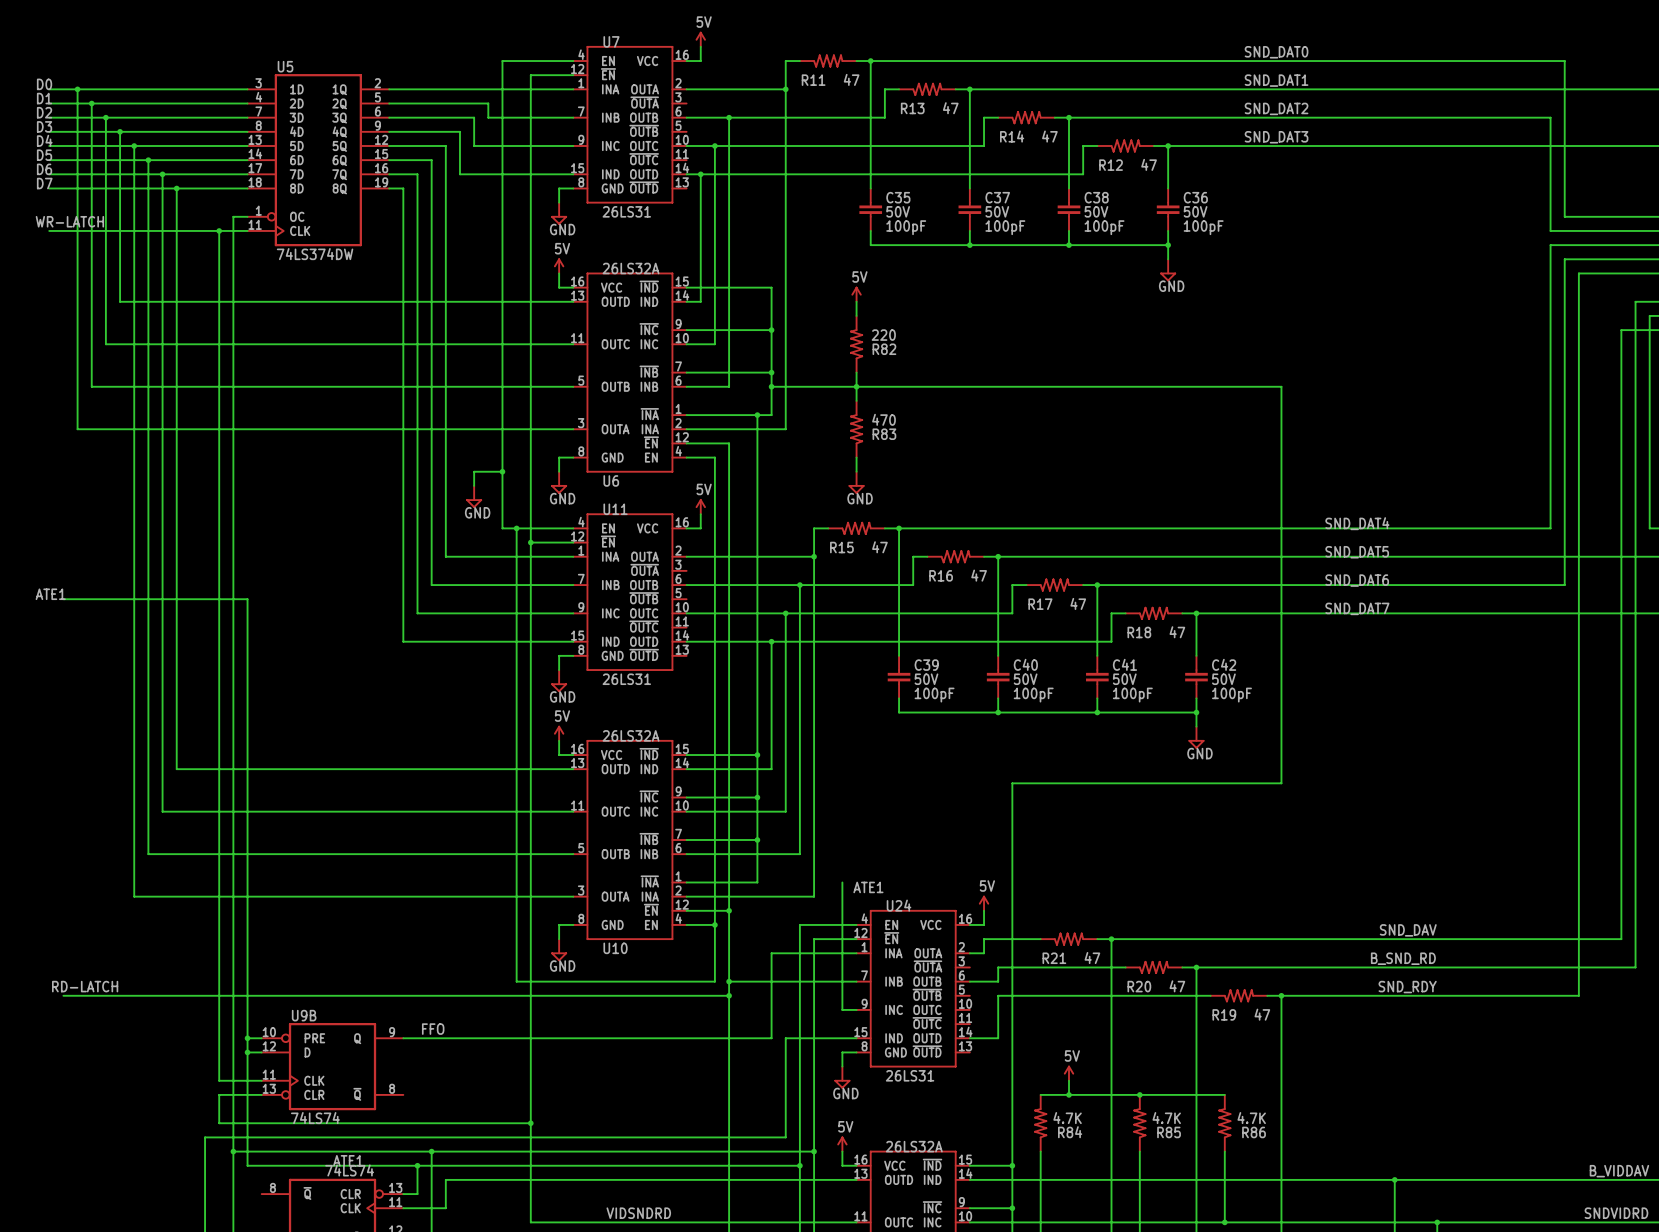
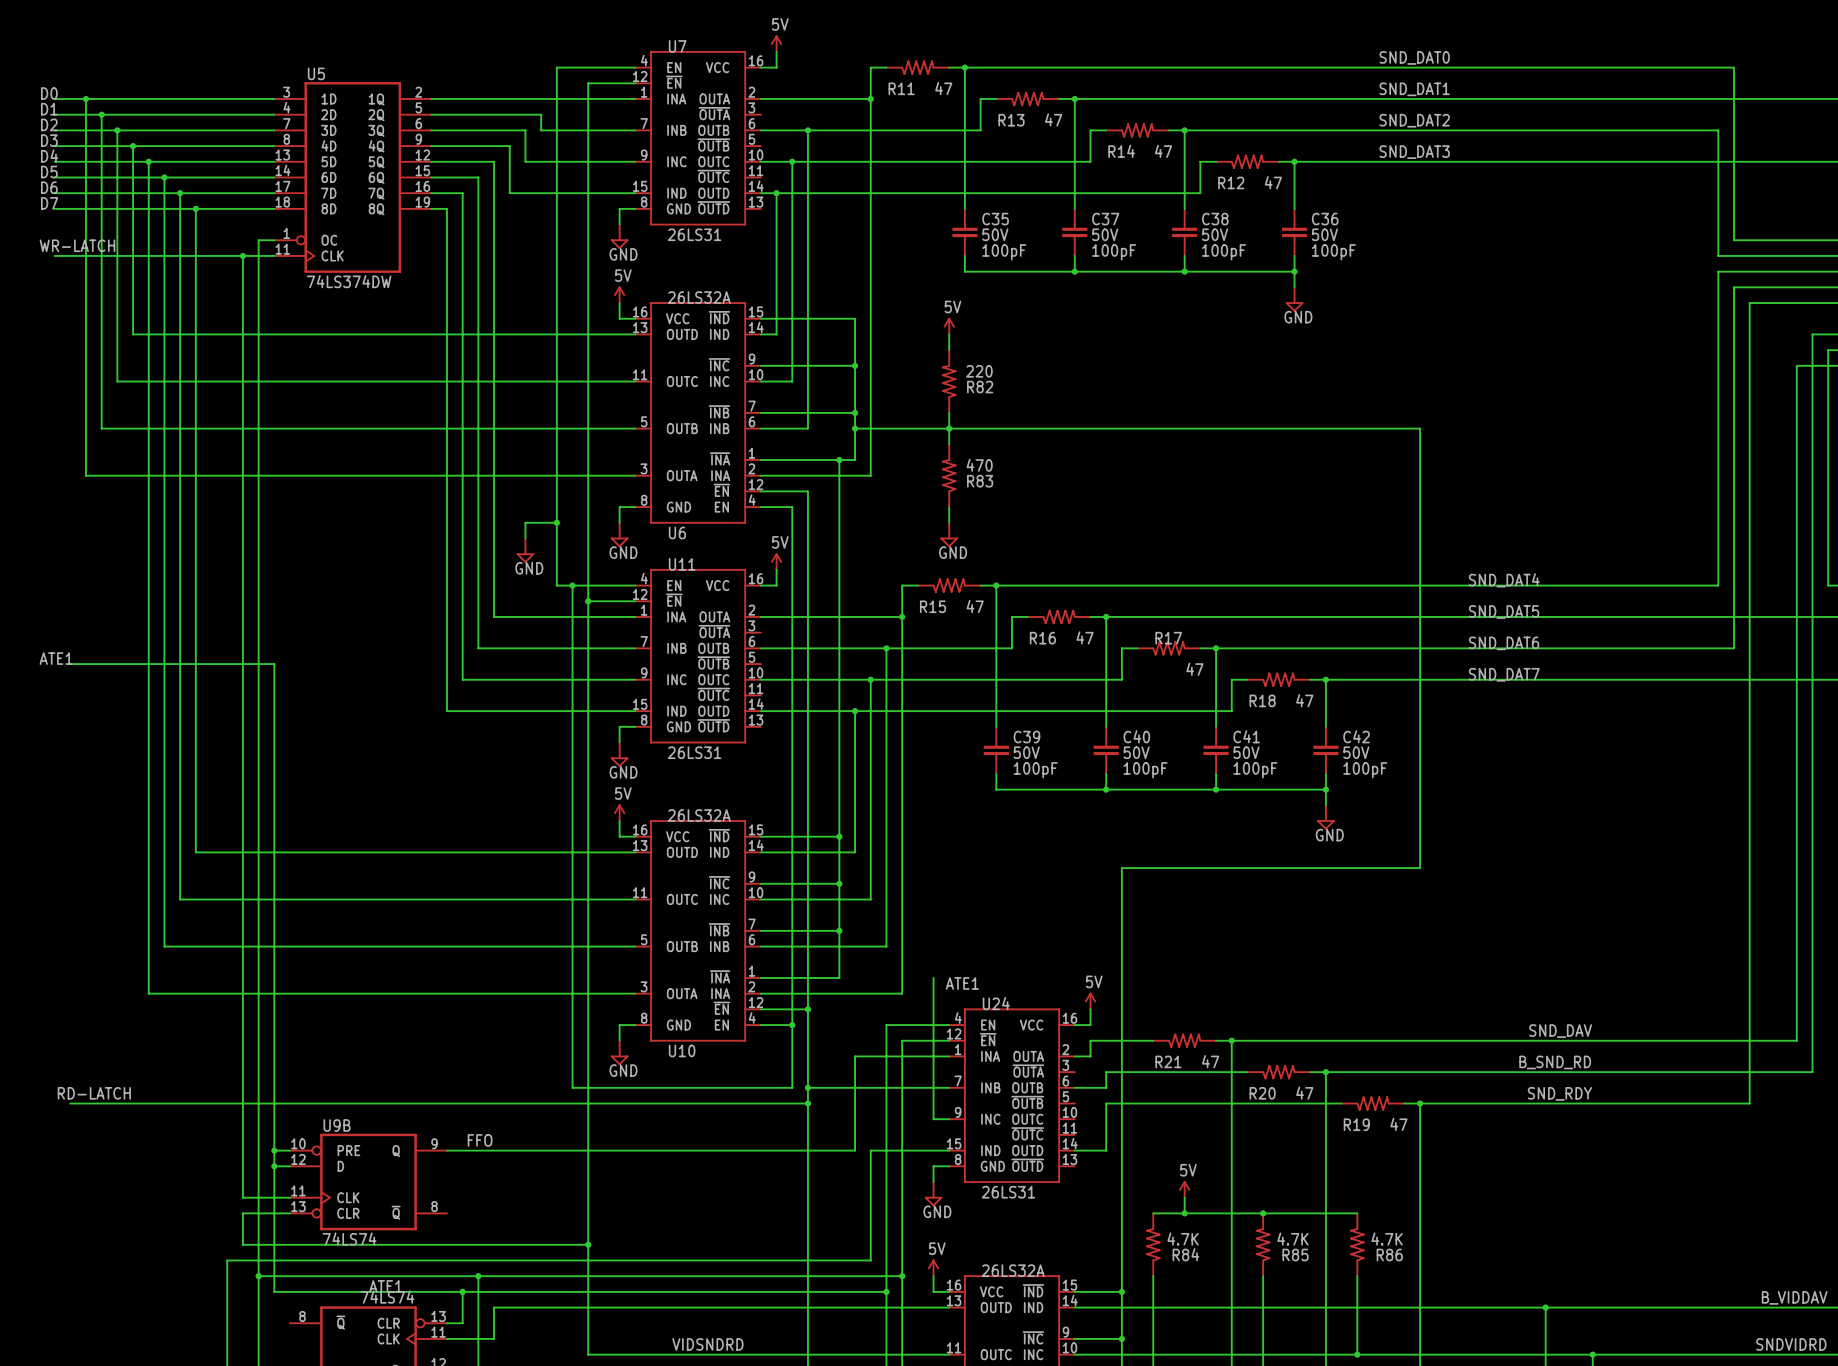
R17 name position: R17 (1040, 604) -> R17 (1168, 638)

